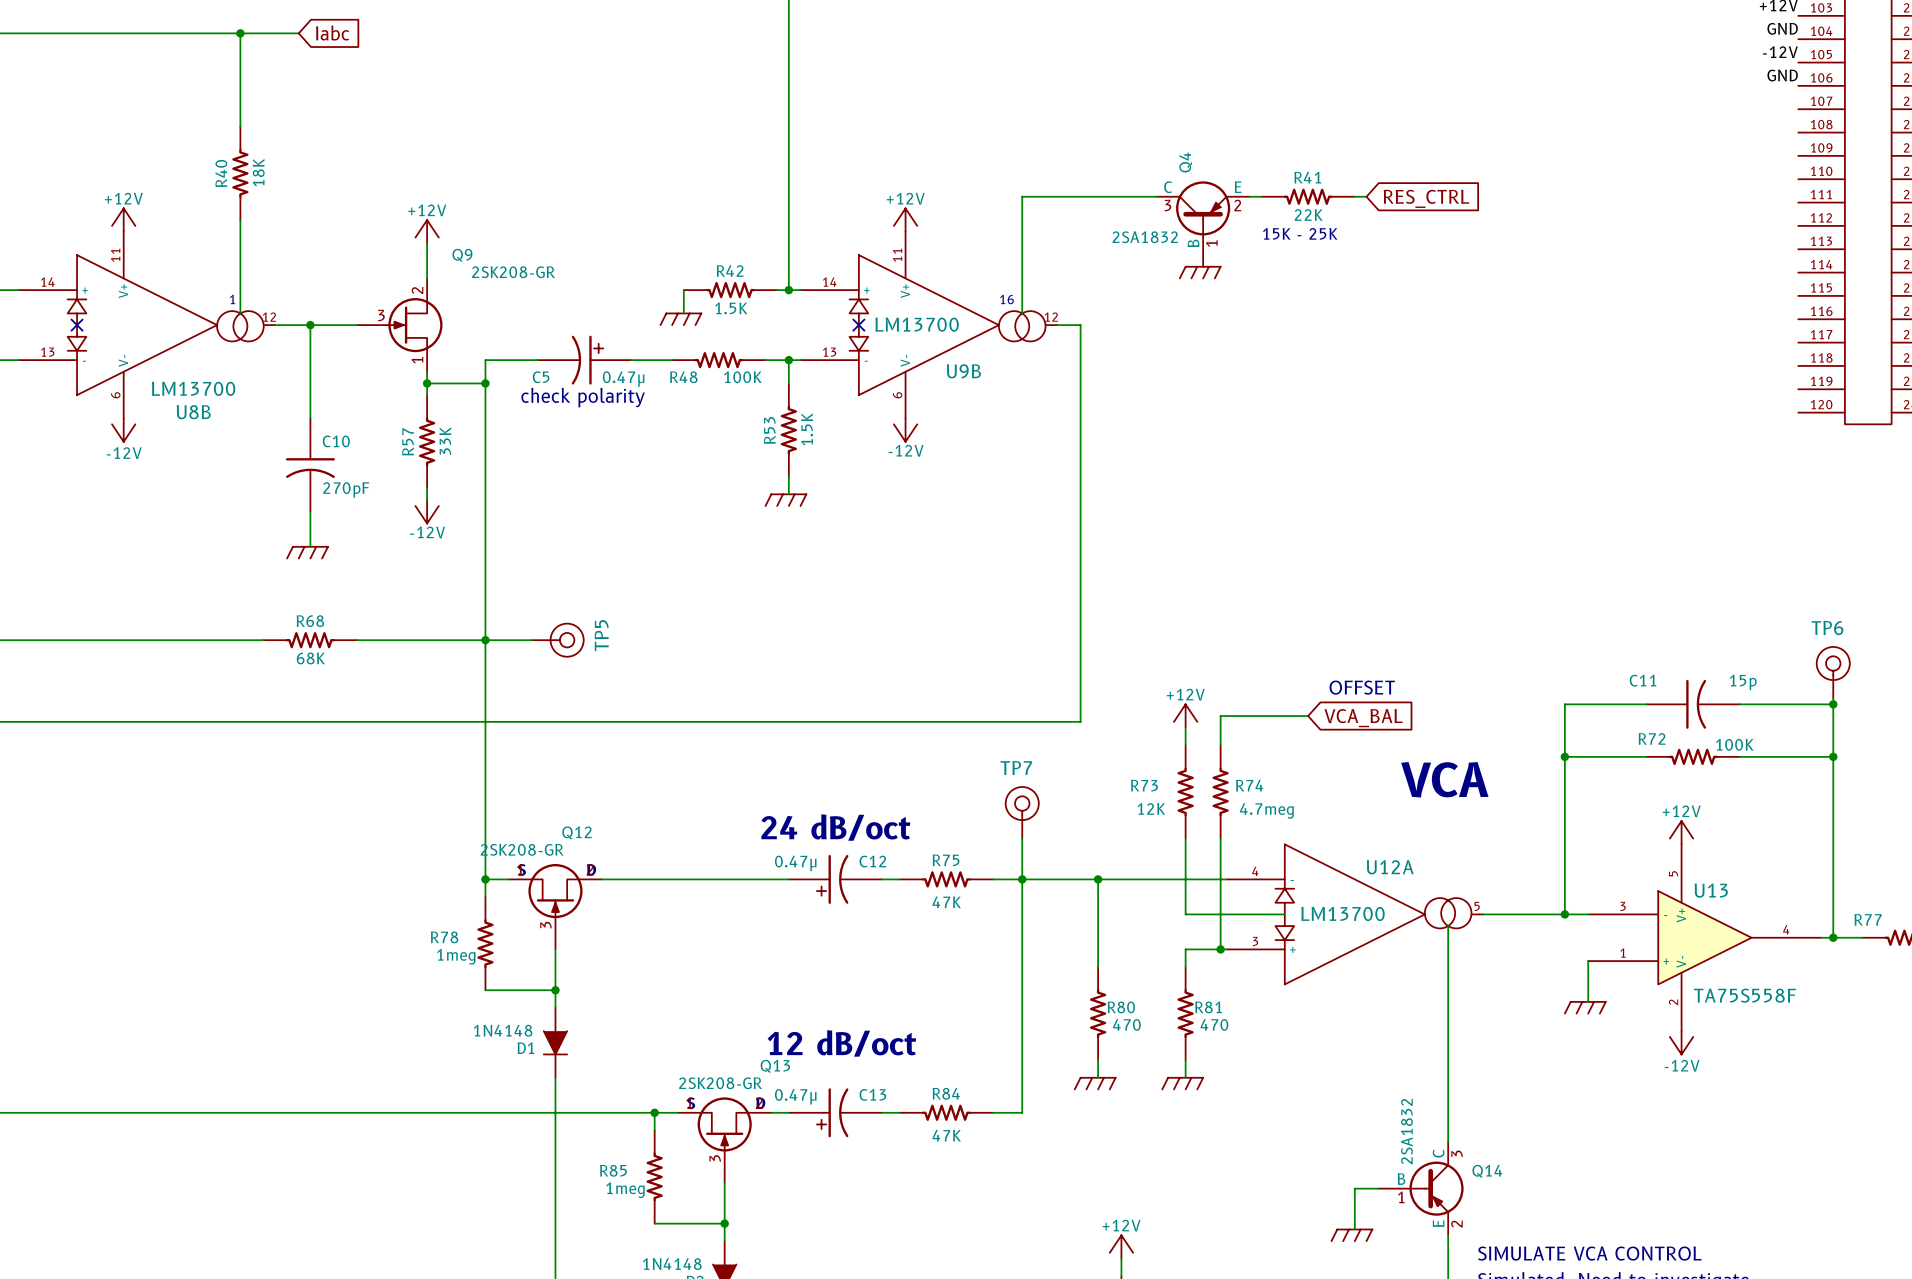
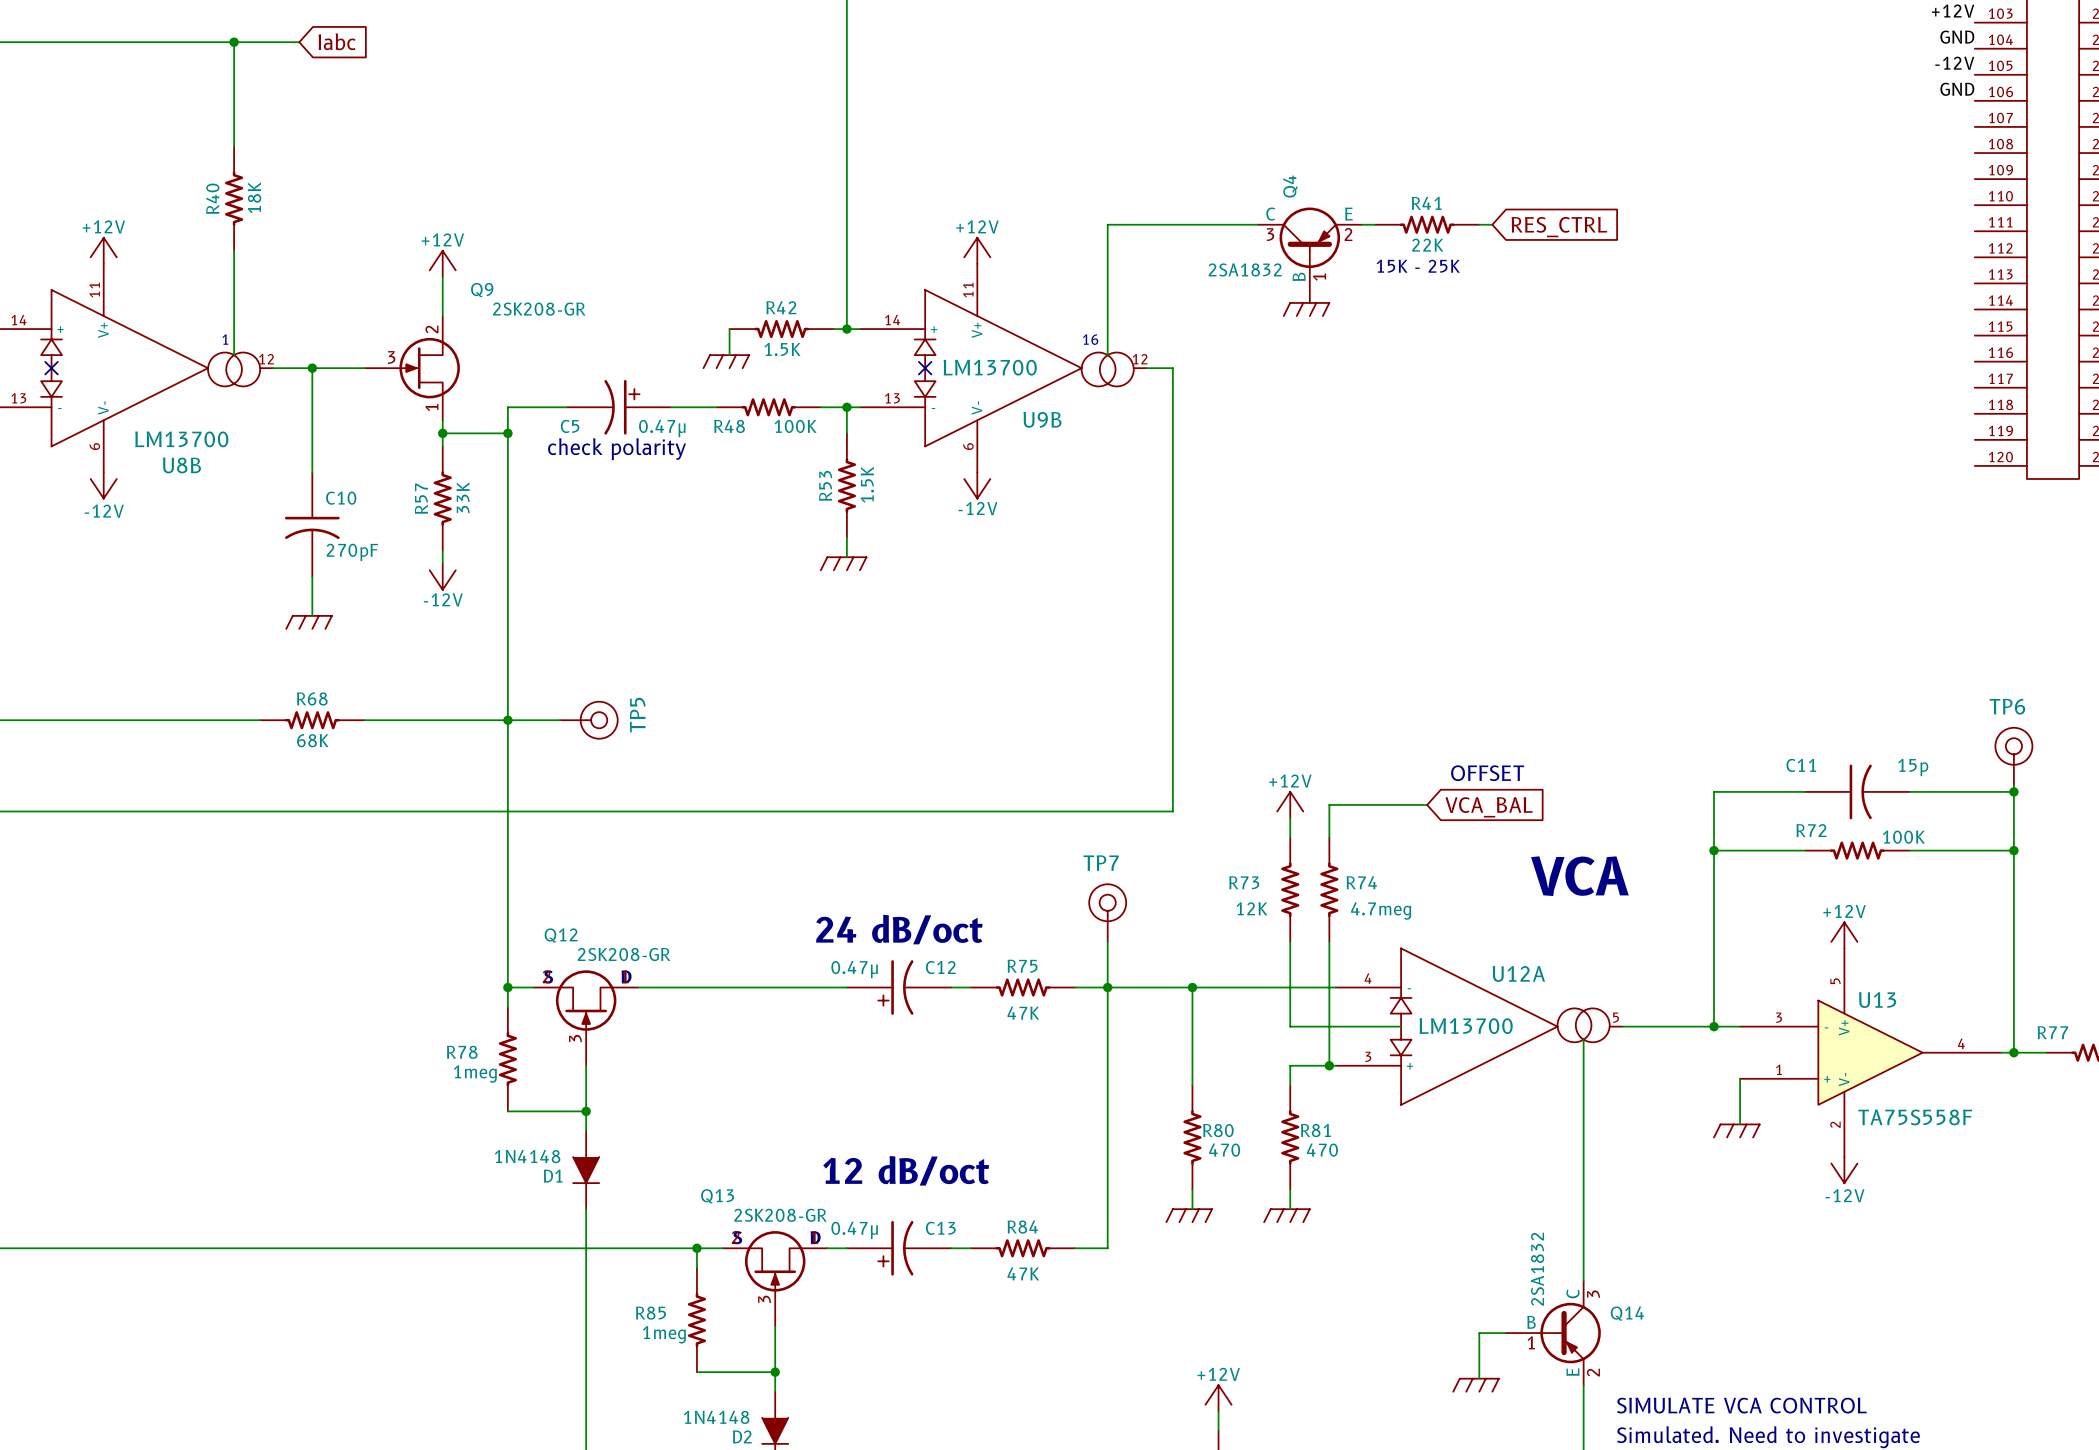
Q12 flip: as is (555, 891) -> left-right (586, 1000)
Q13 flip: as is (724, 1124) -> left-right (775, 1261)

